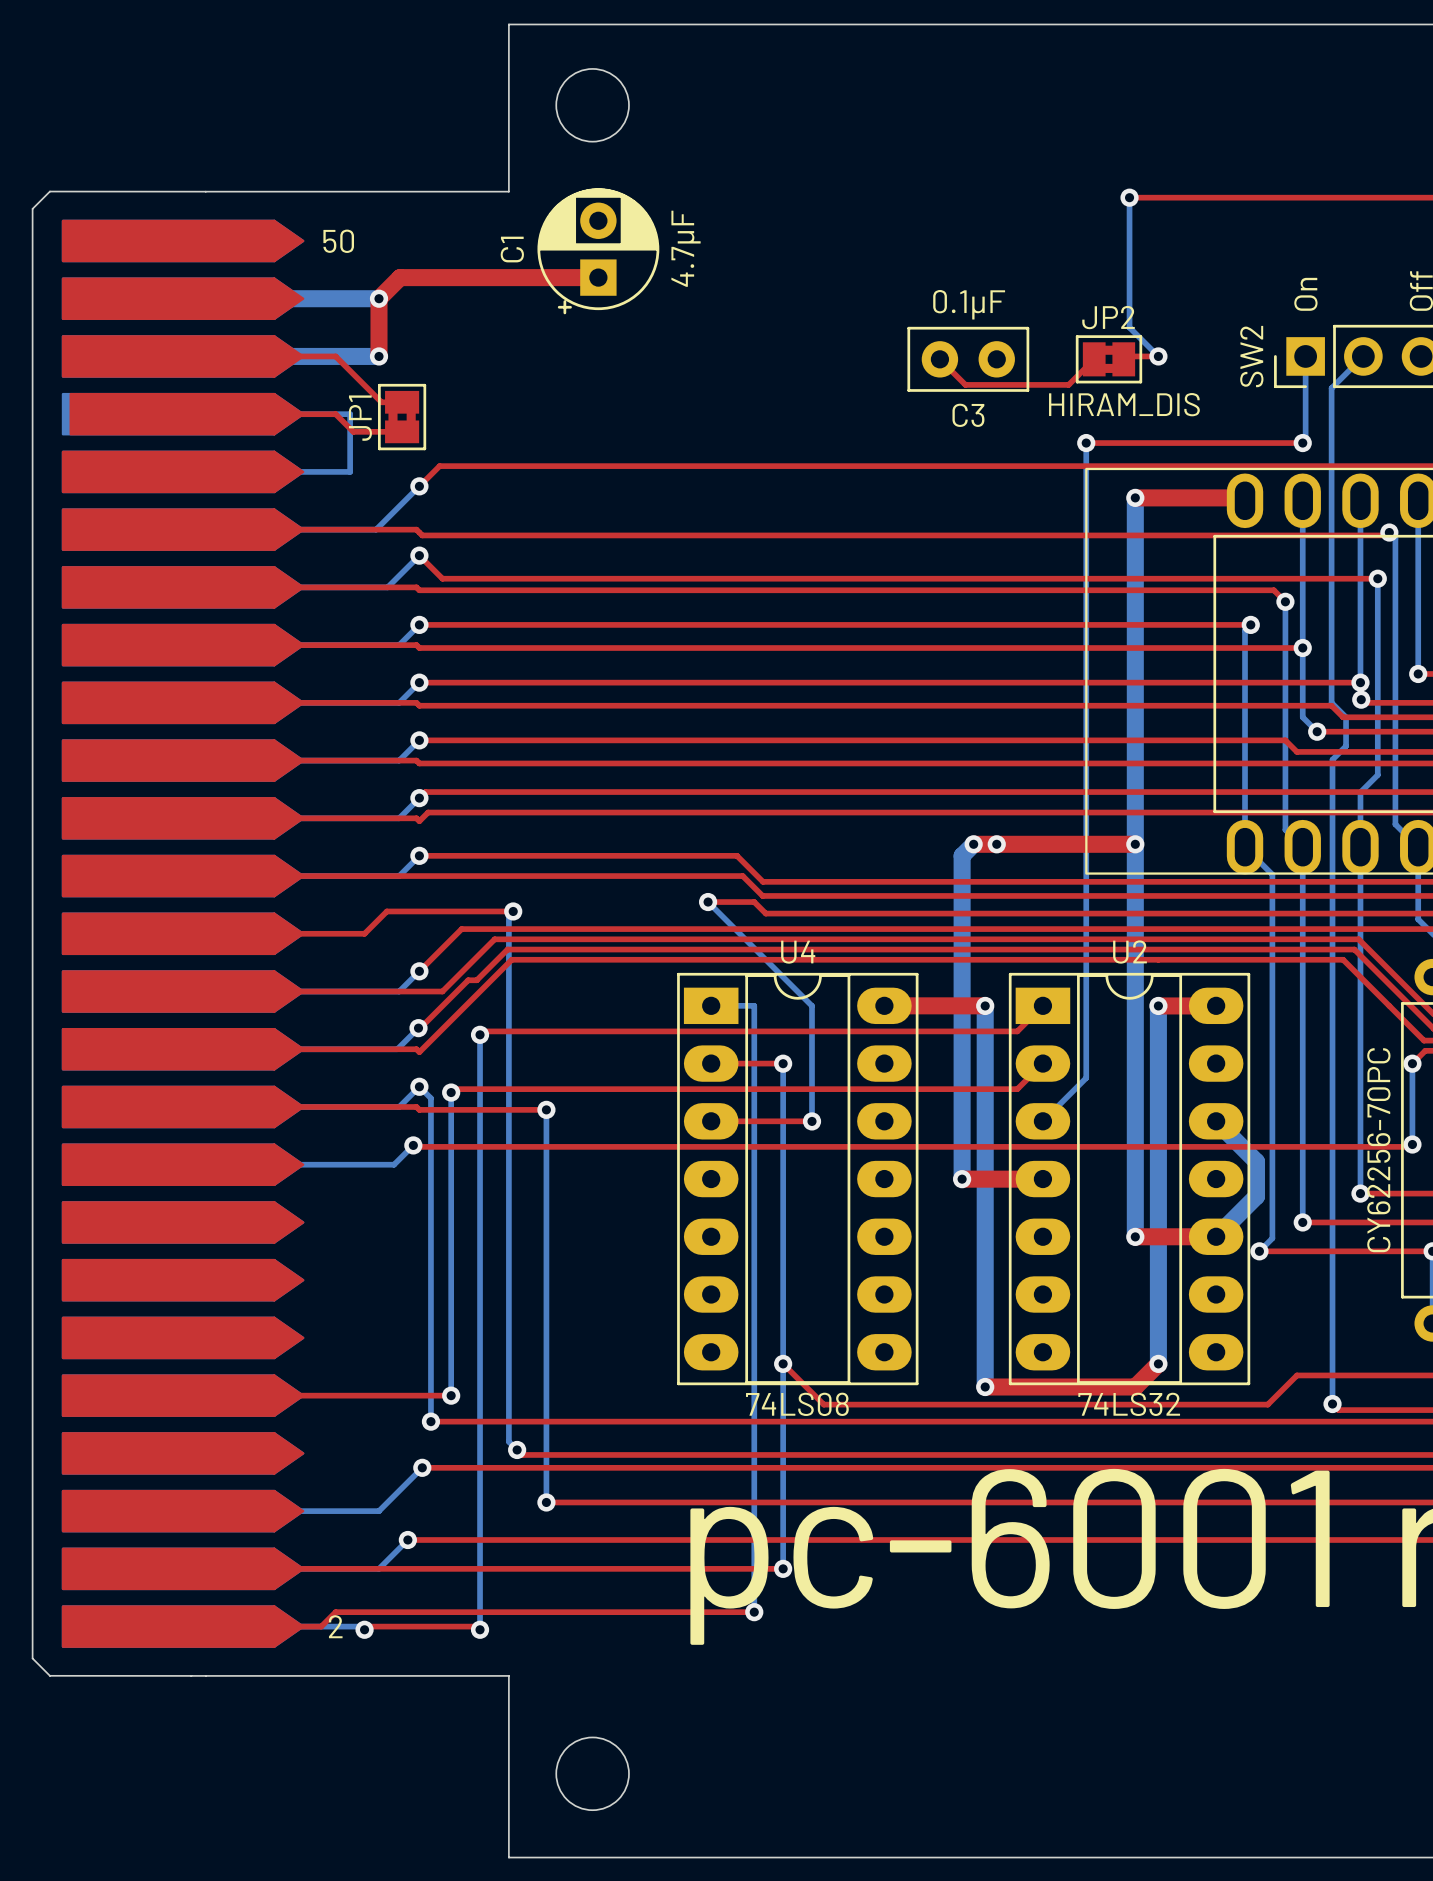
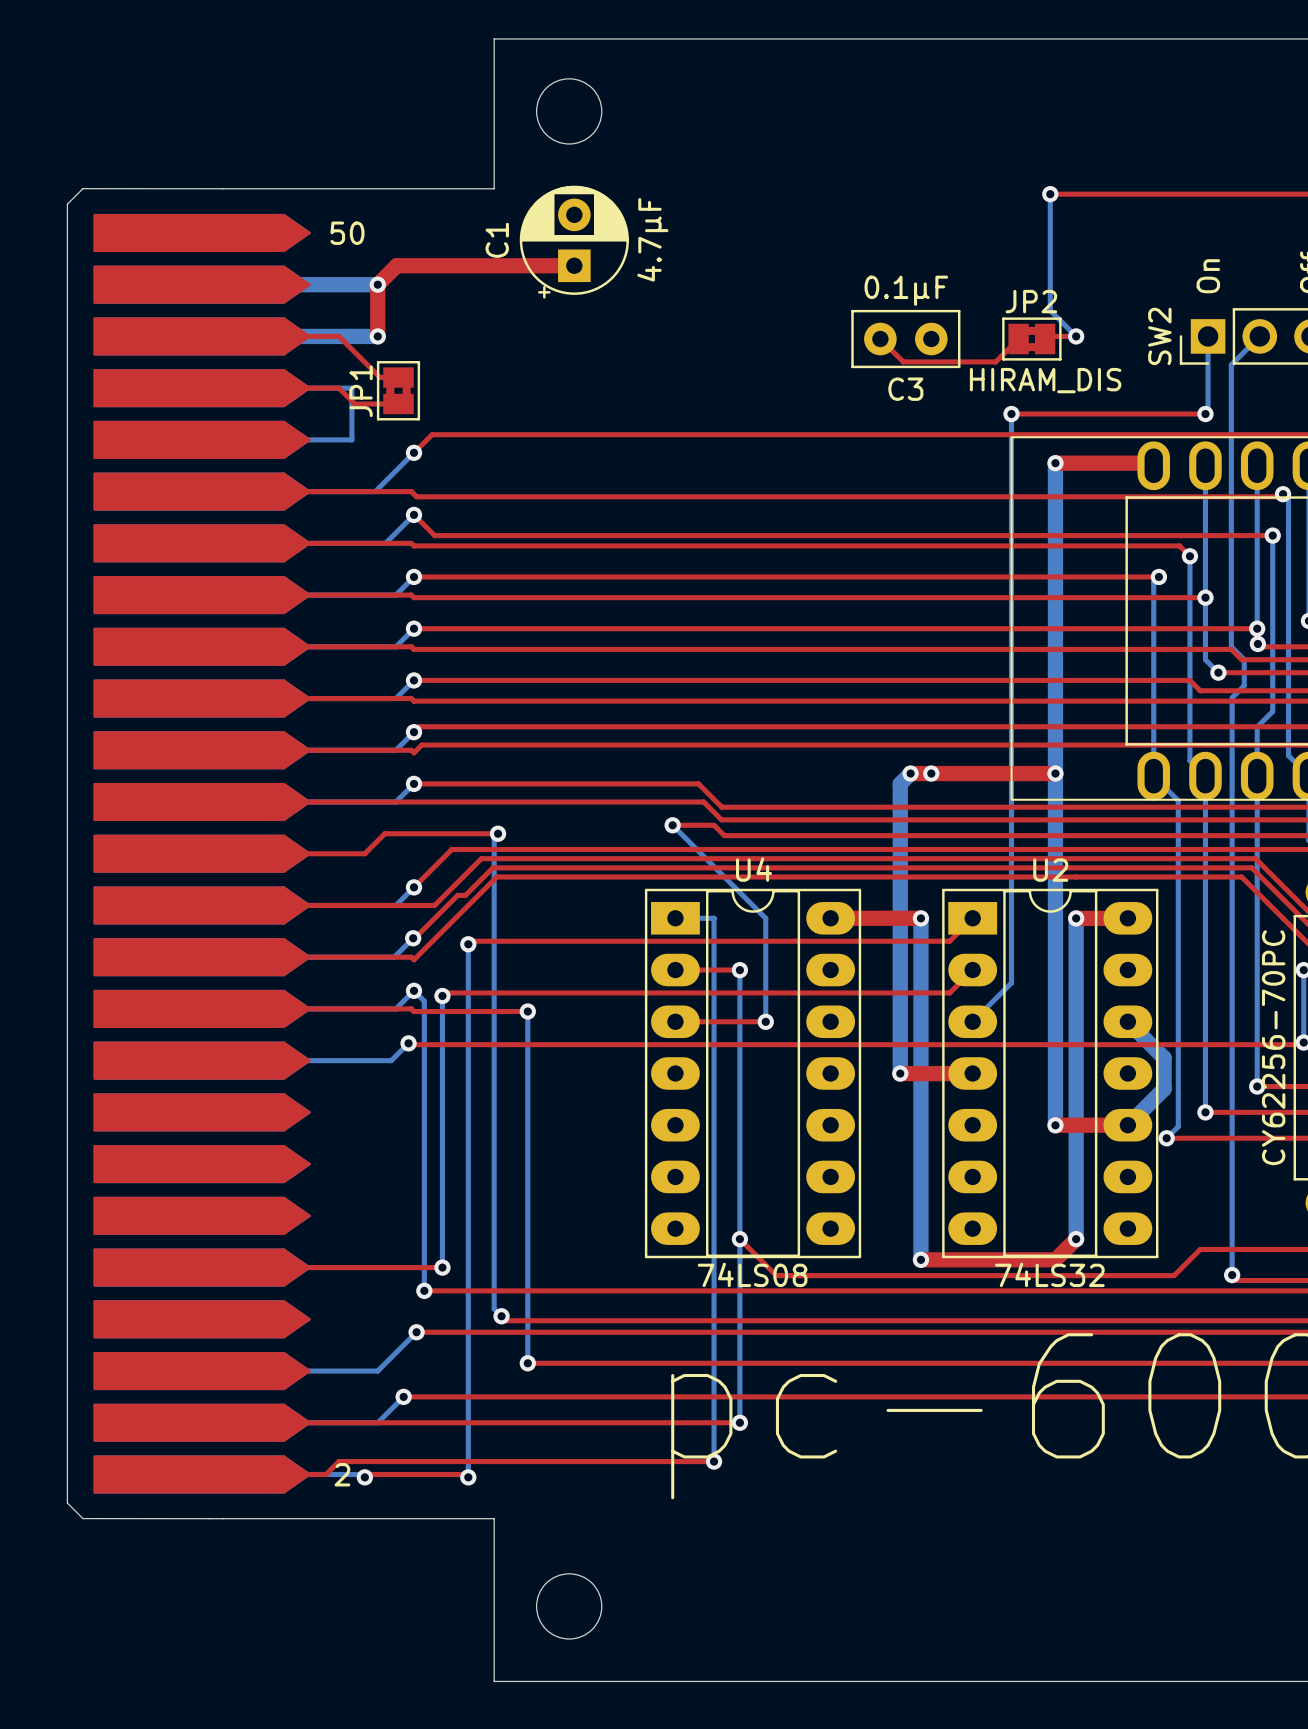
part footprint: [61, 219, 305, 1648] -> [93, 213, 311, 1494]

